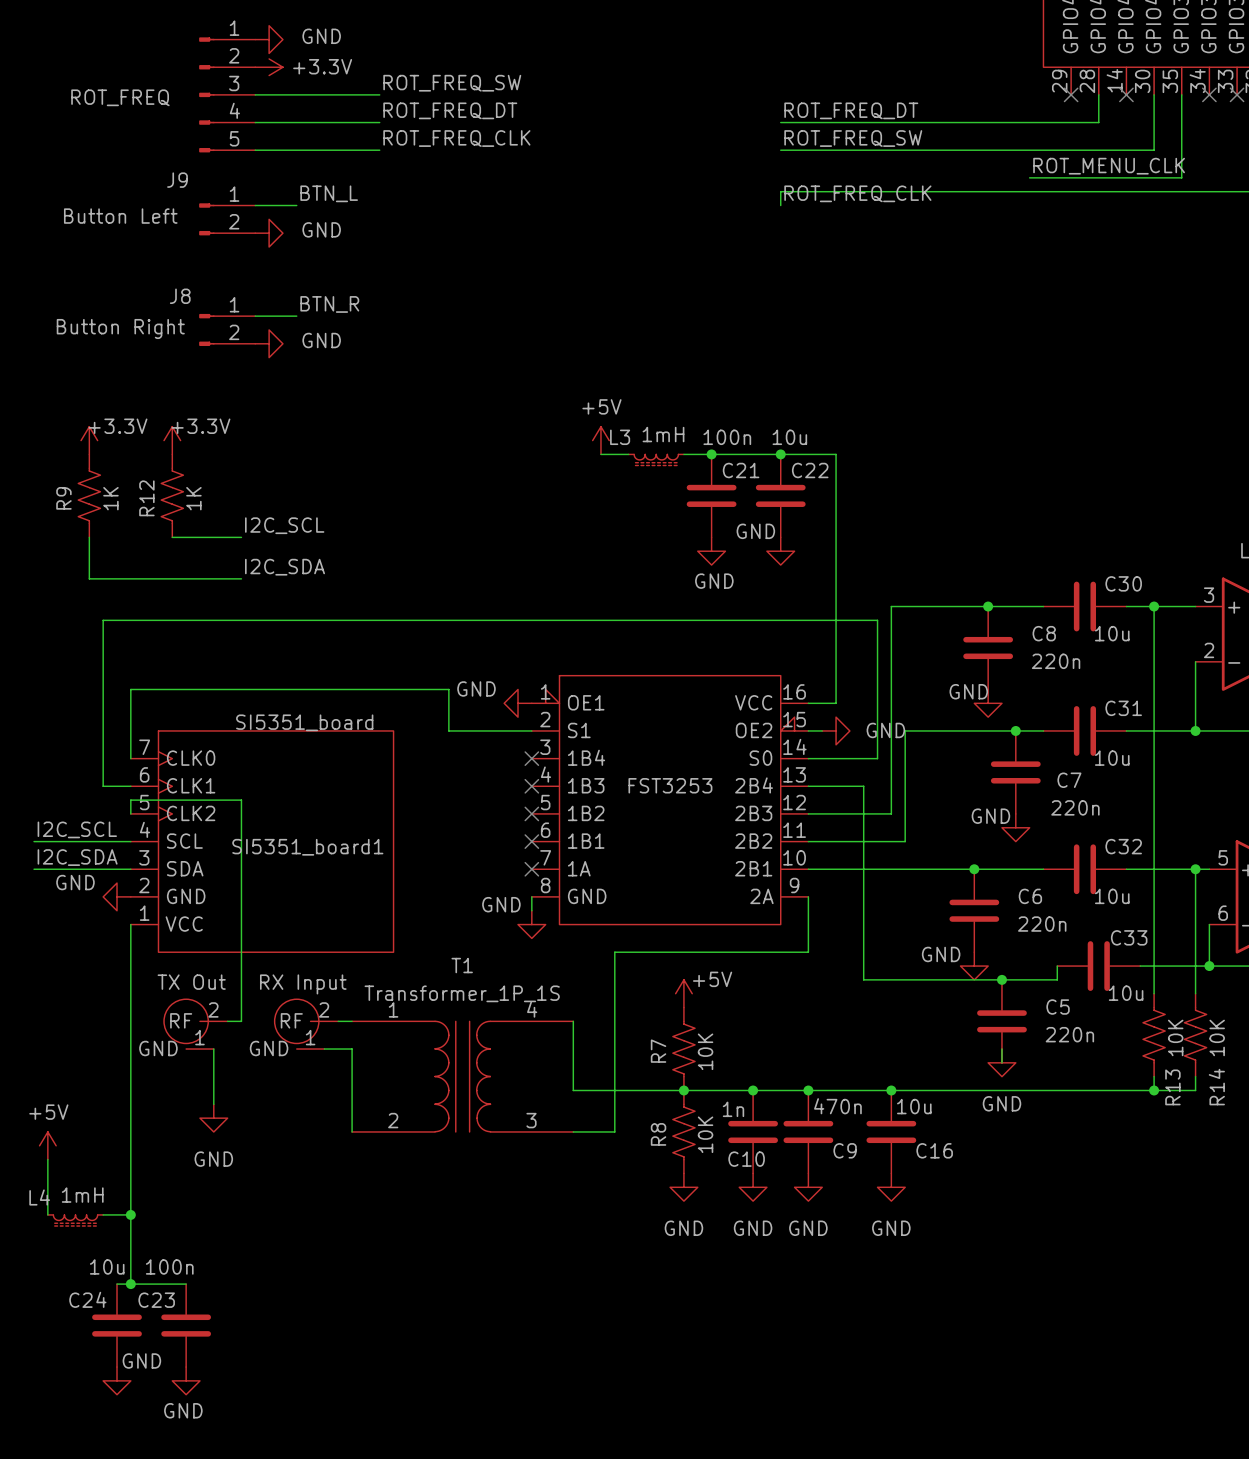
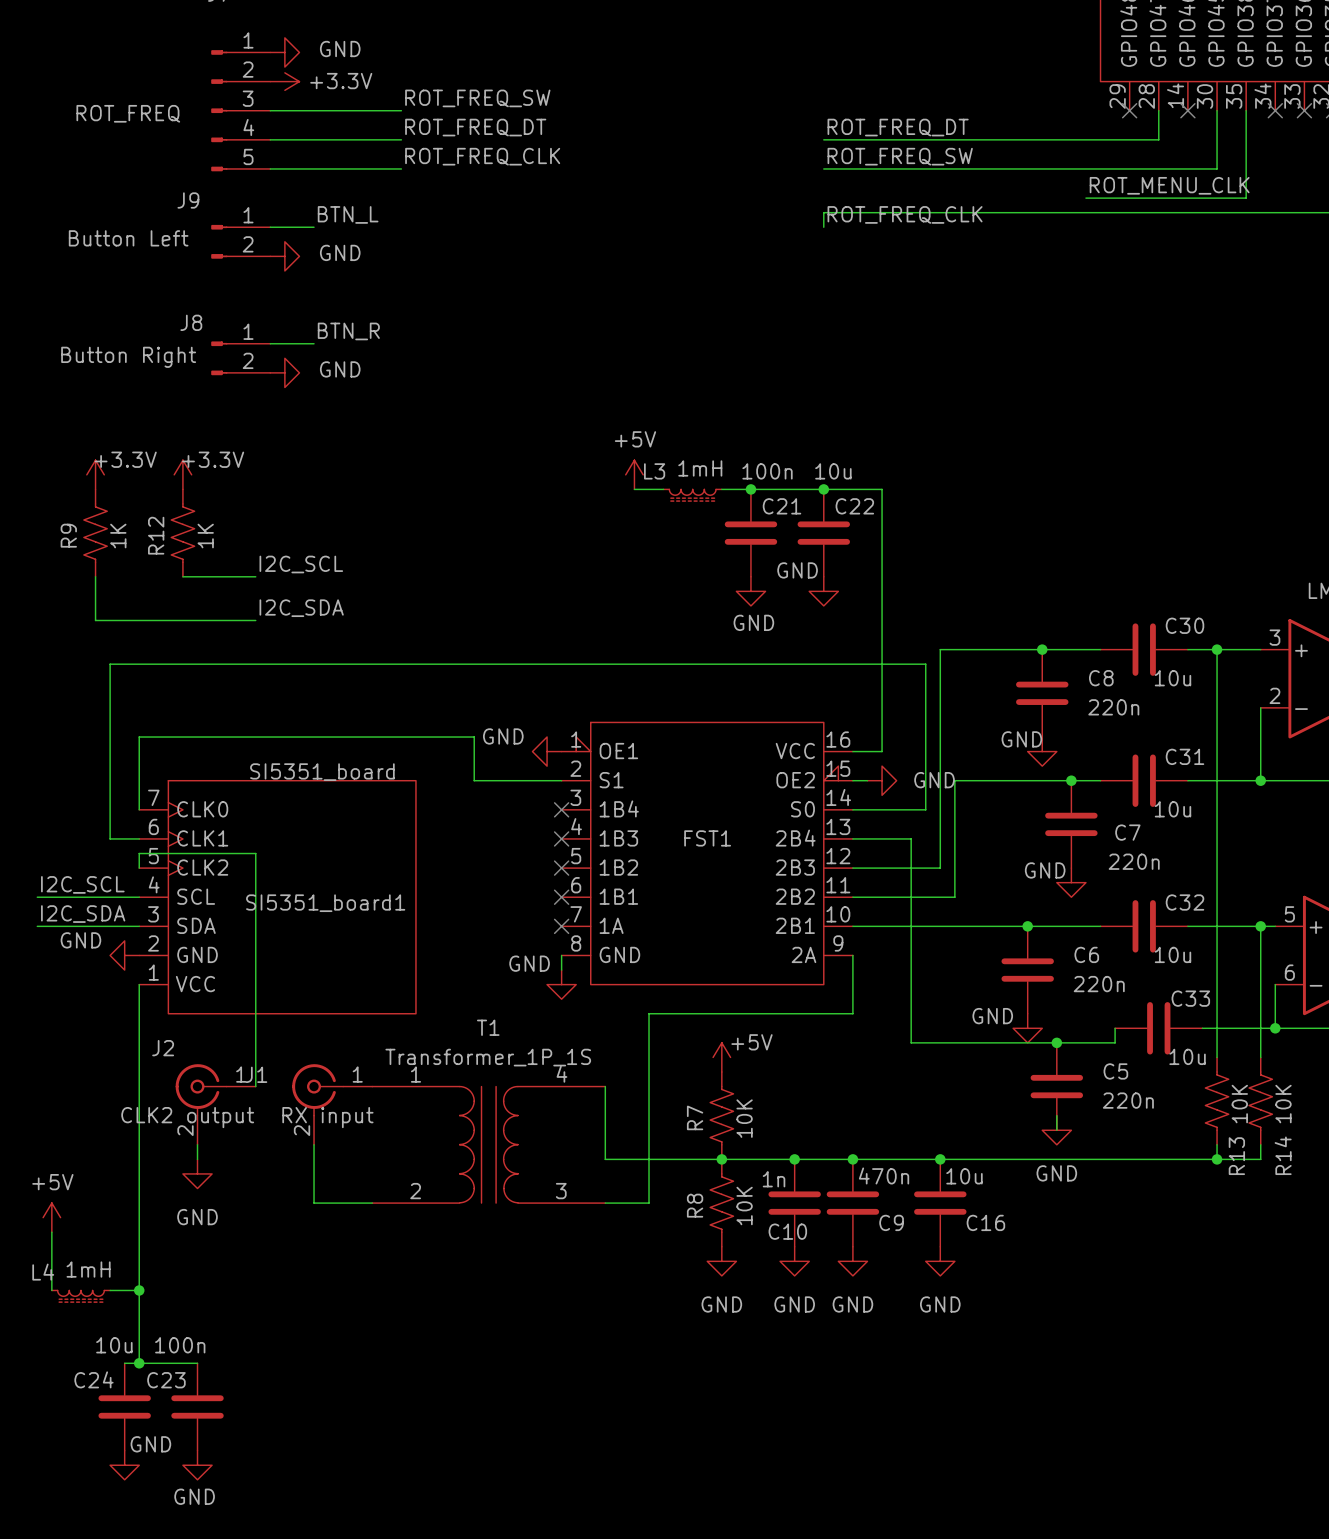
FST3253 name: FST3253 (670, 785) -> FST1 (707, 838)
part: TX Out (195, 1024) -> none
part: RX Input (306, 1024) -> none
J2: none -> CLK2 output (215, 1104)
J1: none -> RX input (332, 1104)
wire: (213, 1049) (213, 1104) -> none
wire: (324, 1049) (352, 1049) (352, 1131) -> (314, 1144) (314, 1203) (372, 1203)
wire: none -> (197, 1144) (197, 1159)
power symbol position: GND (213, 1118) -> GND (197, 1173)

